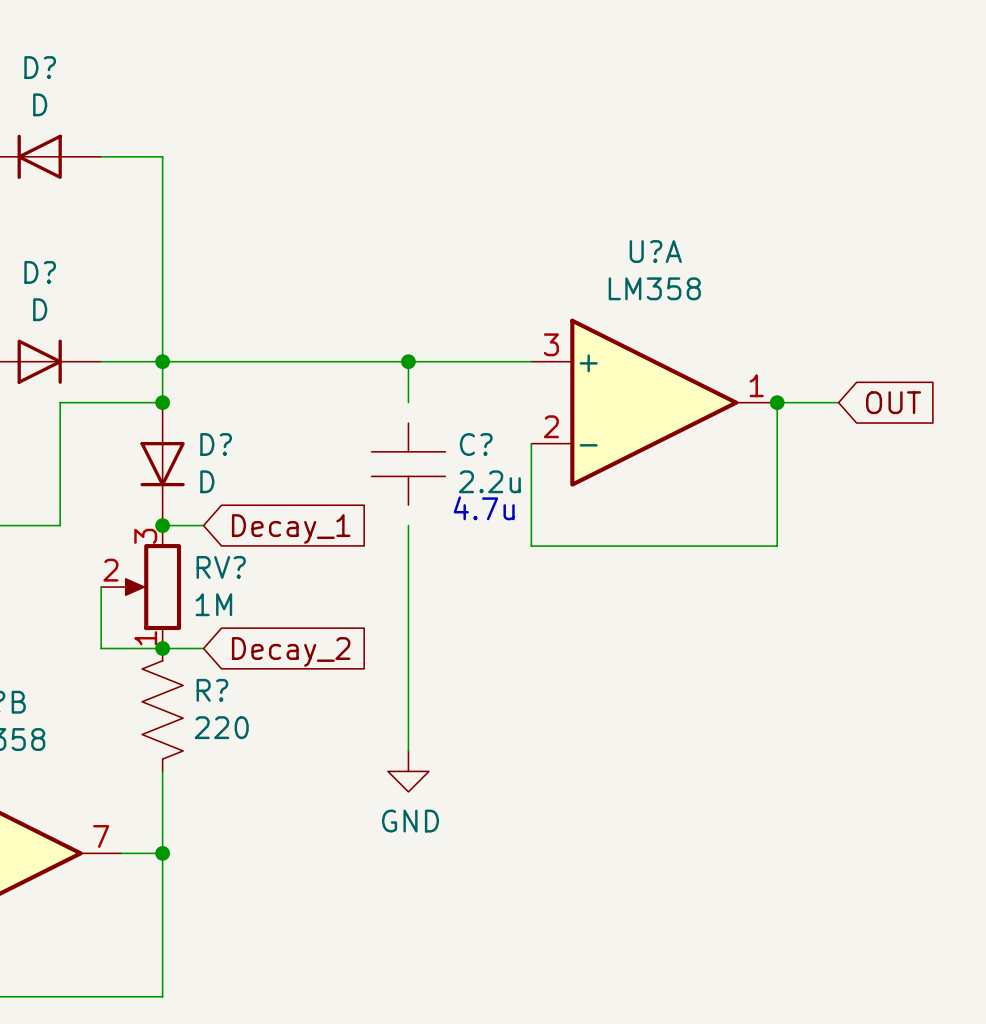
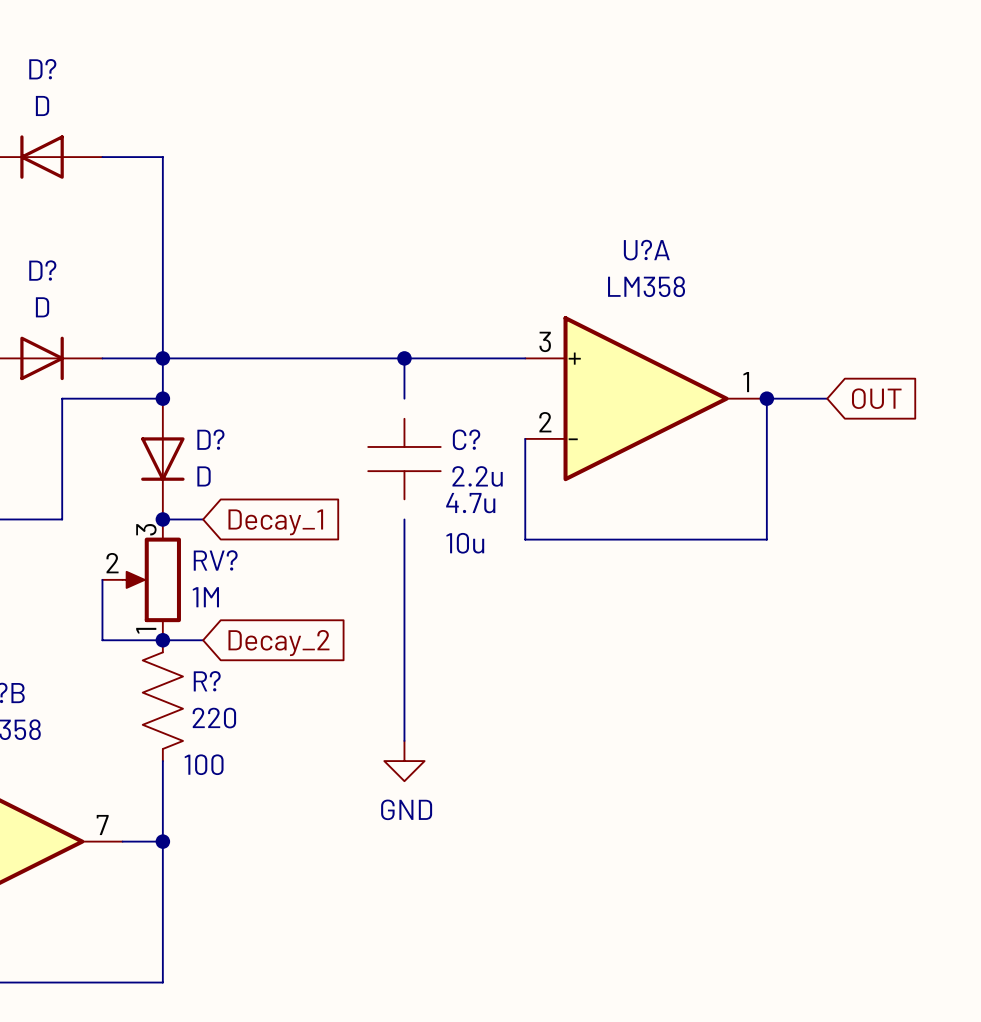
text: none -> 10u (465, 543)
text: none -> 100 (204, 764)

